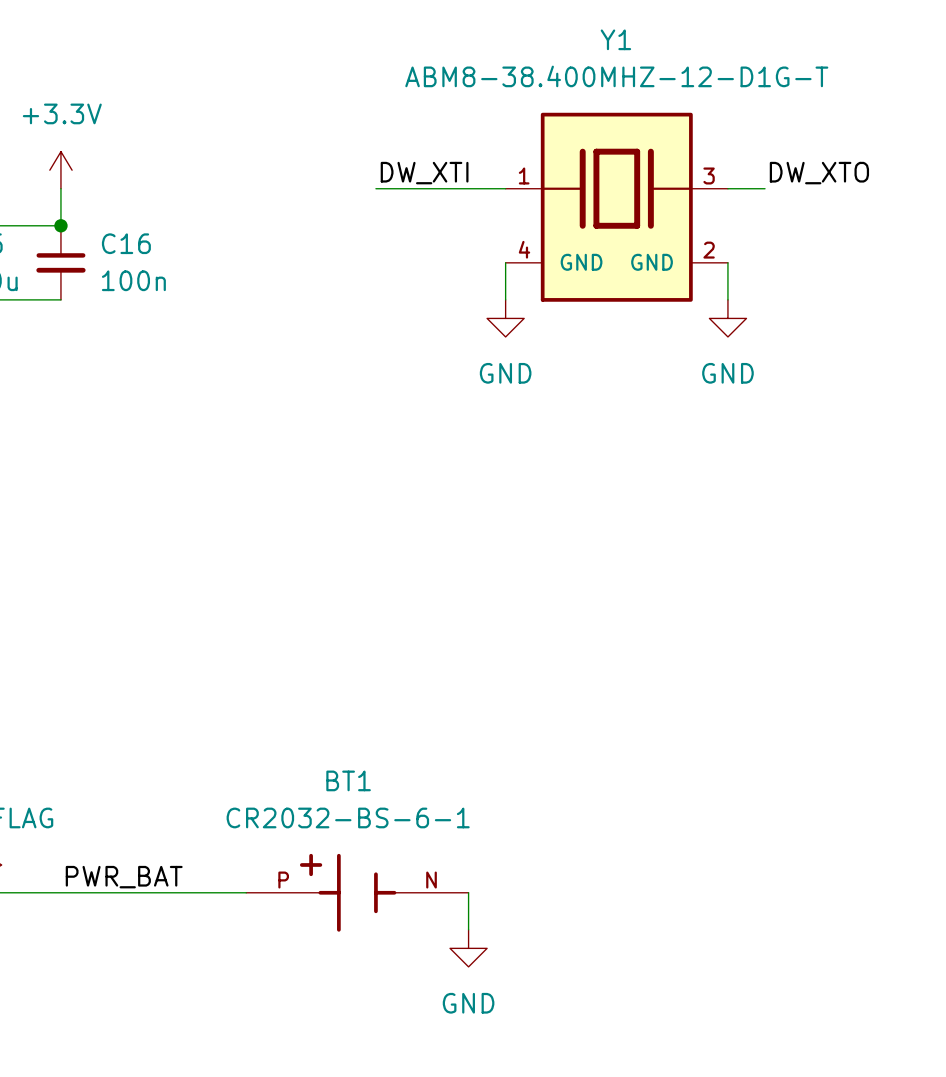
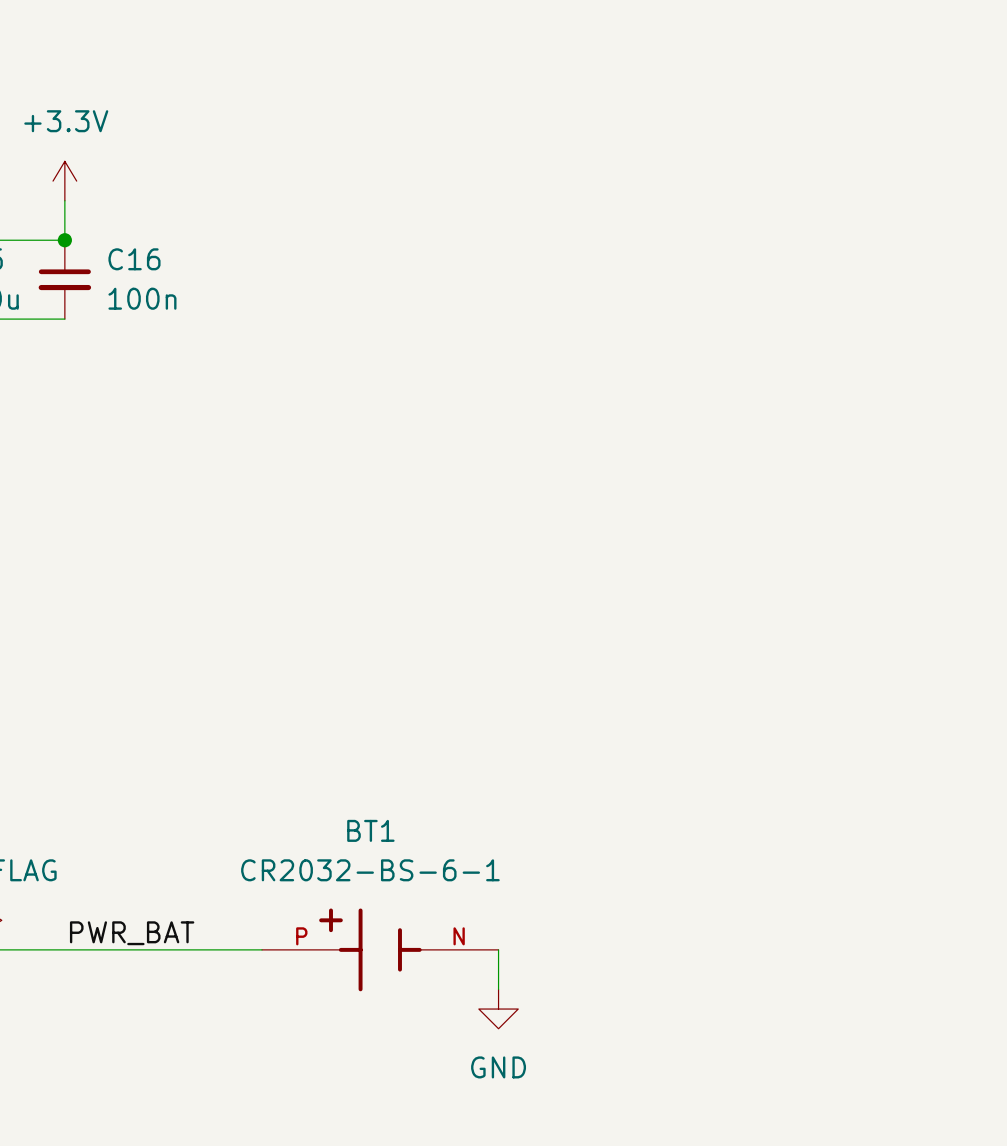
label: DW_XTI (424, 173) -> none
label: DW_XTO (819, 173) -> none
wire: (375, 188) (505, 188) -> none
wire: (727, 188) (765, 188) -> none
Y1: ABM8-38.400MHZ-12-D1G-T (616, 207) -> none
wire: (505, 262) (505, 299) -> none
wire: (727, 262) (727, 299) -> none
power symbol: GND (505, 318) -> none
power symbol: GND (727, 318) -> none

